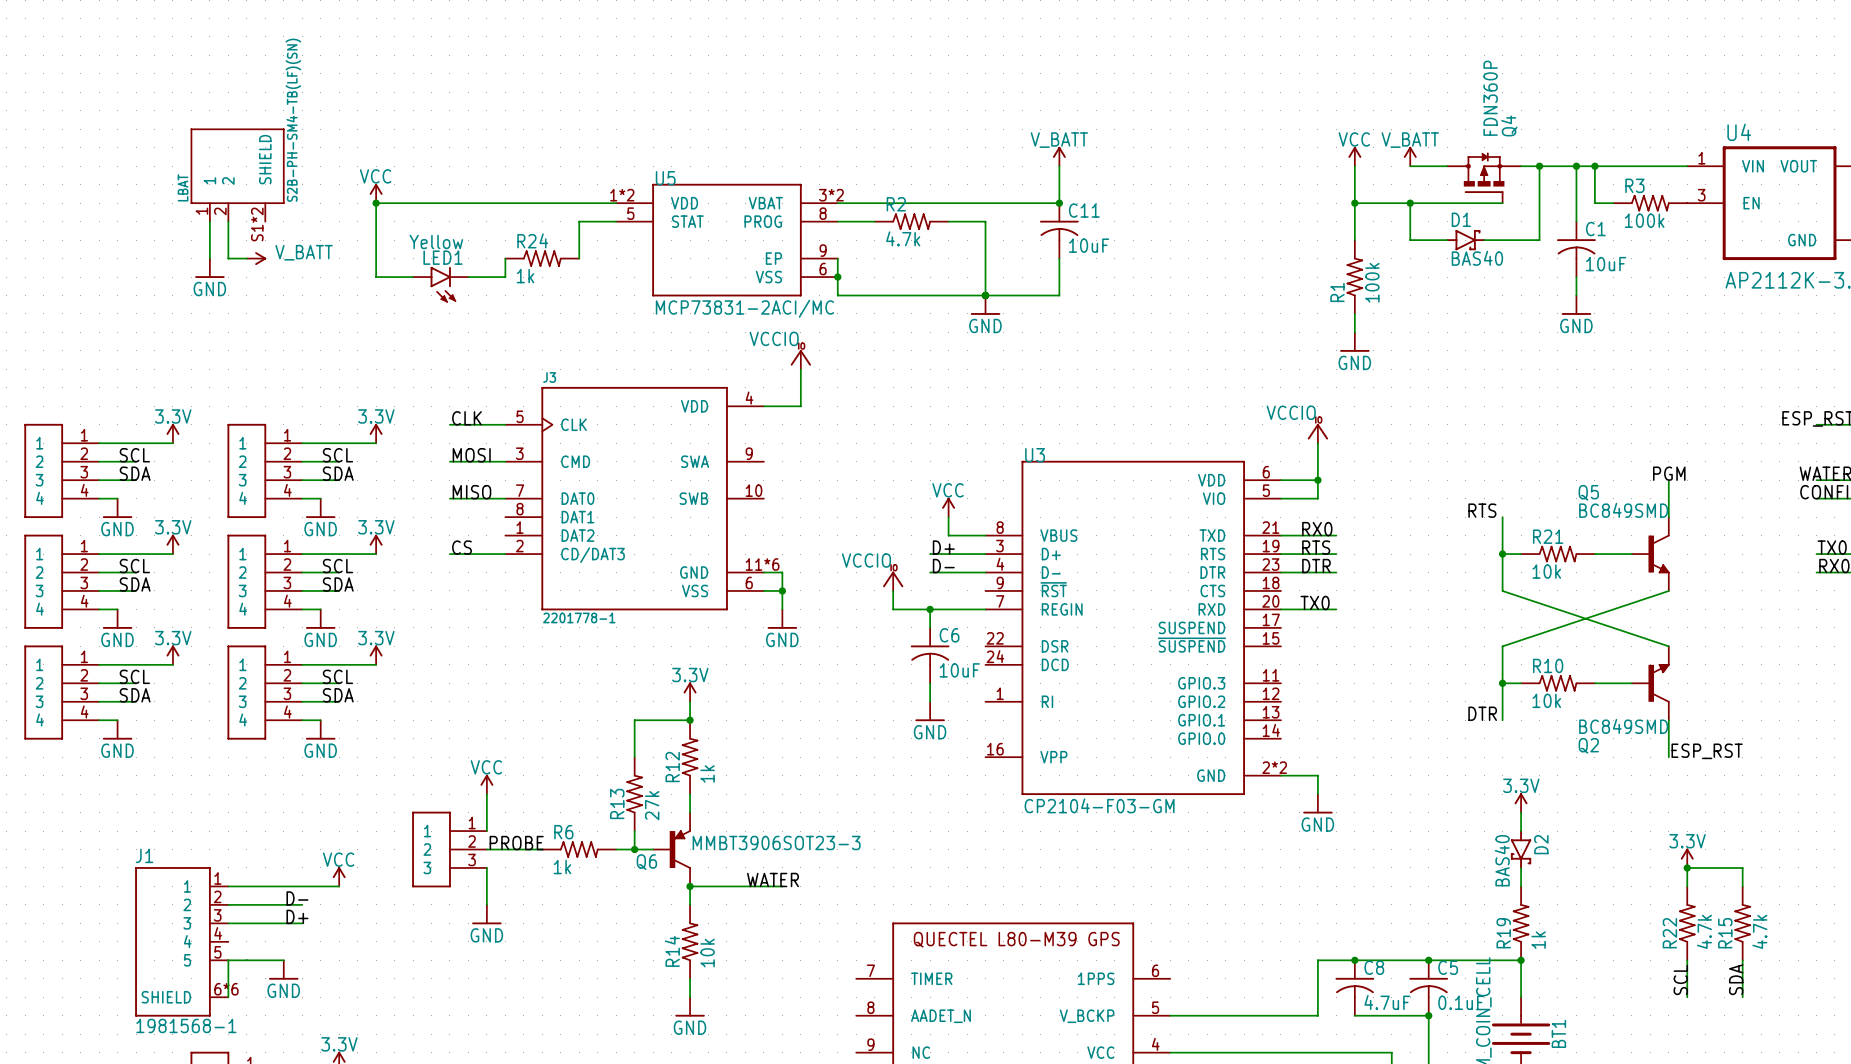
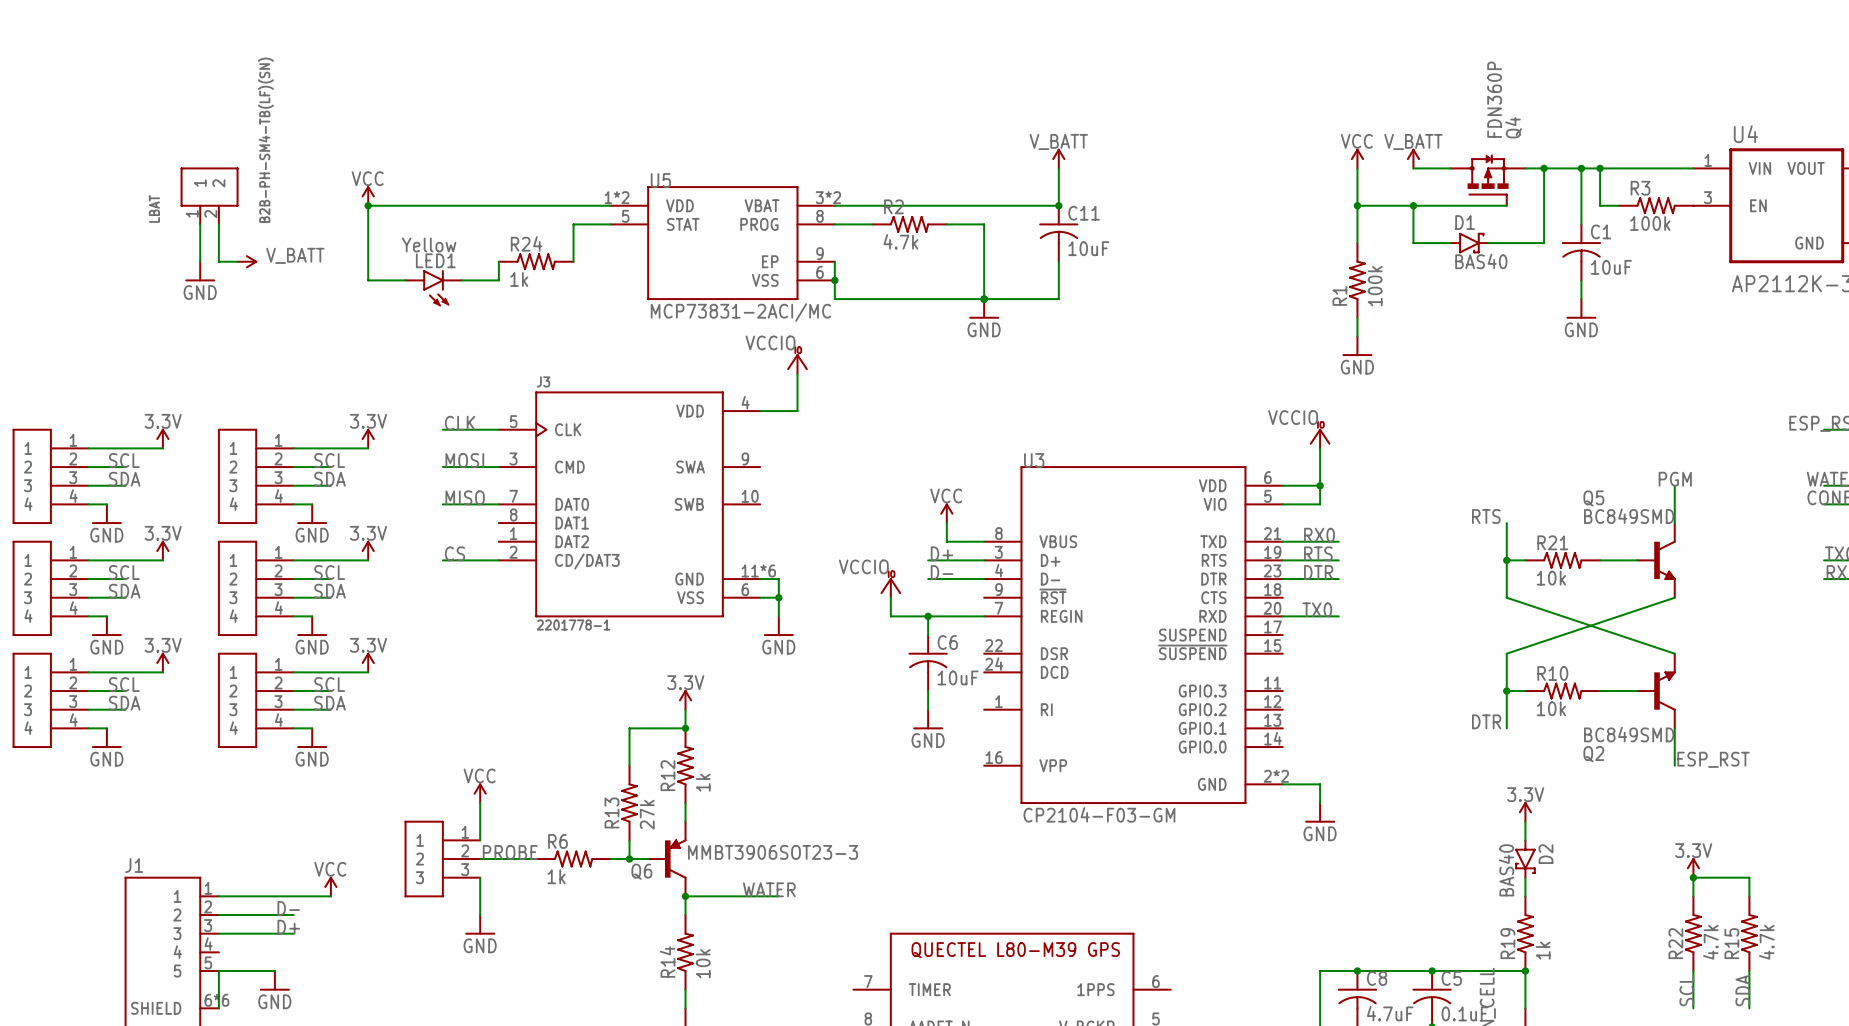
LBAT: S2B-PH-SM4-TB(LF)(SN) (237, 175) -> none
LBAT: none -> B2B-PH-SM4-TB(LF)(SN) (209, 195)

